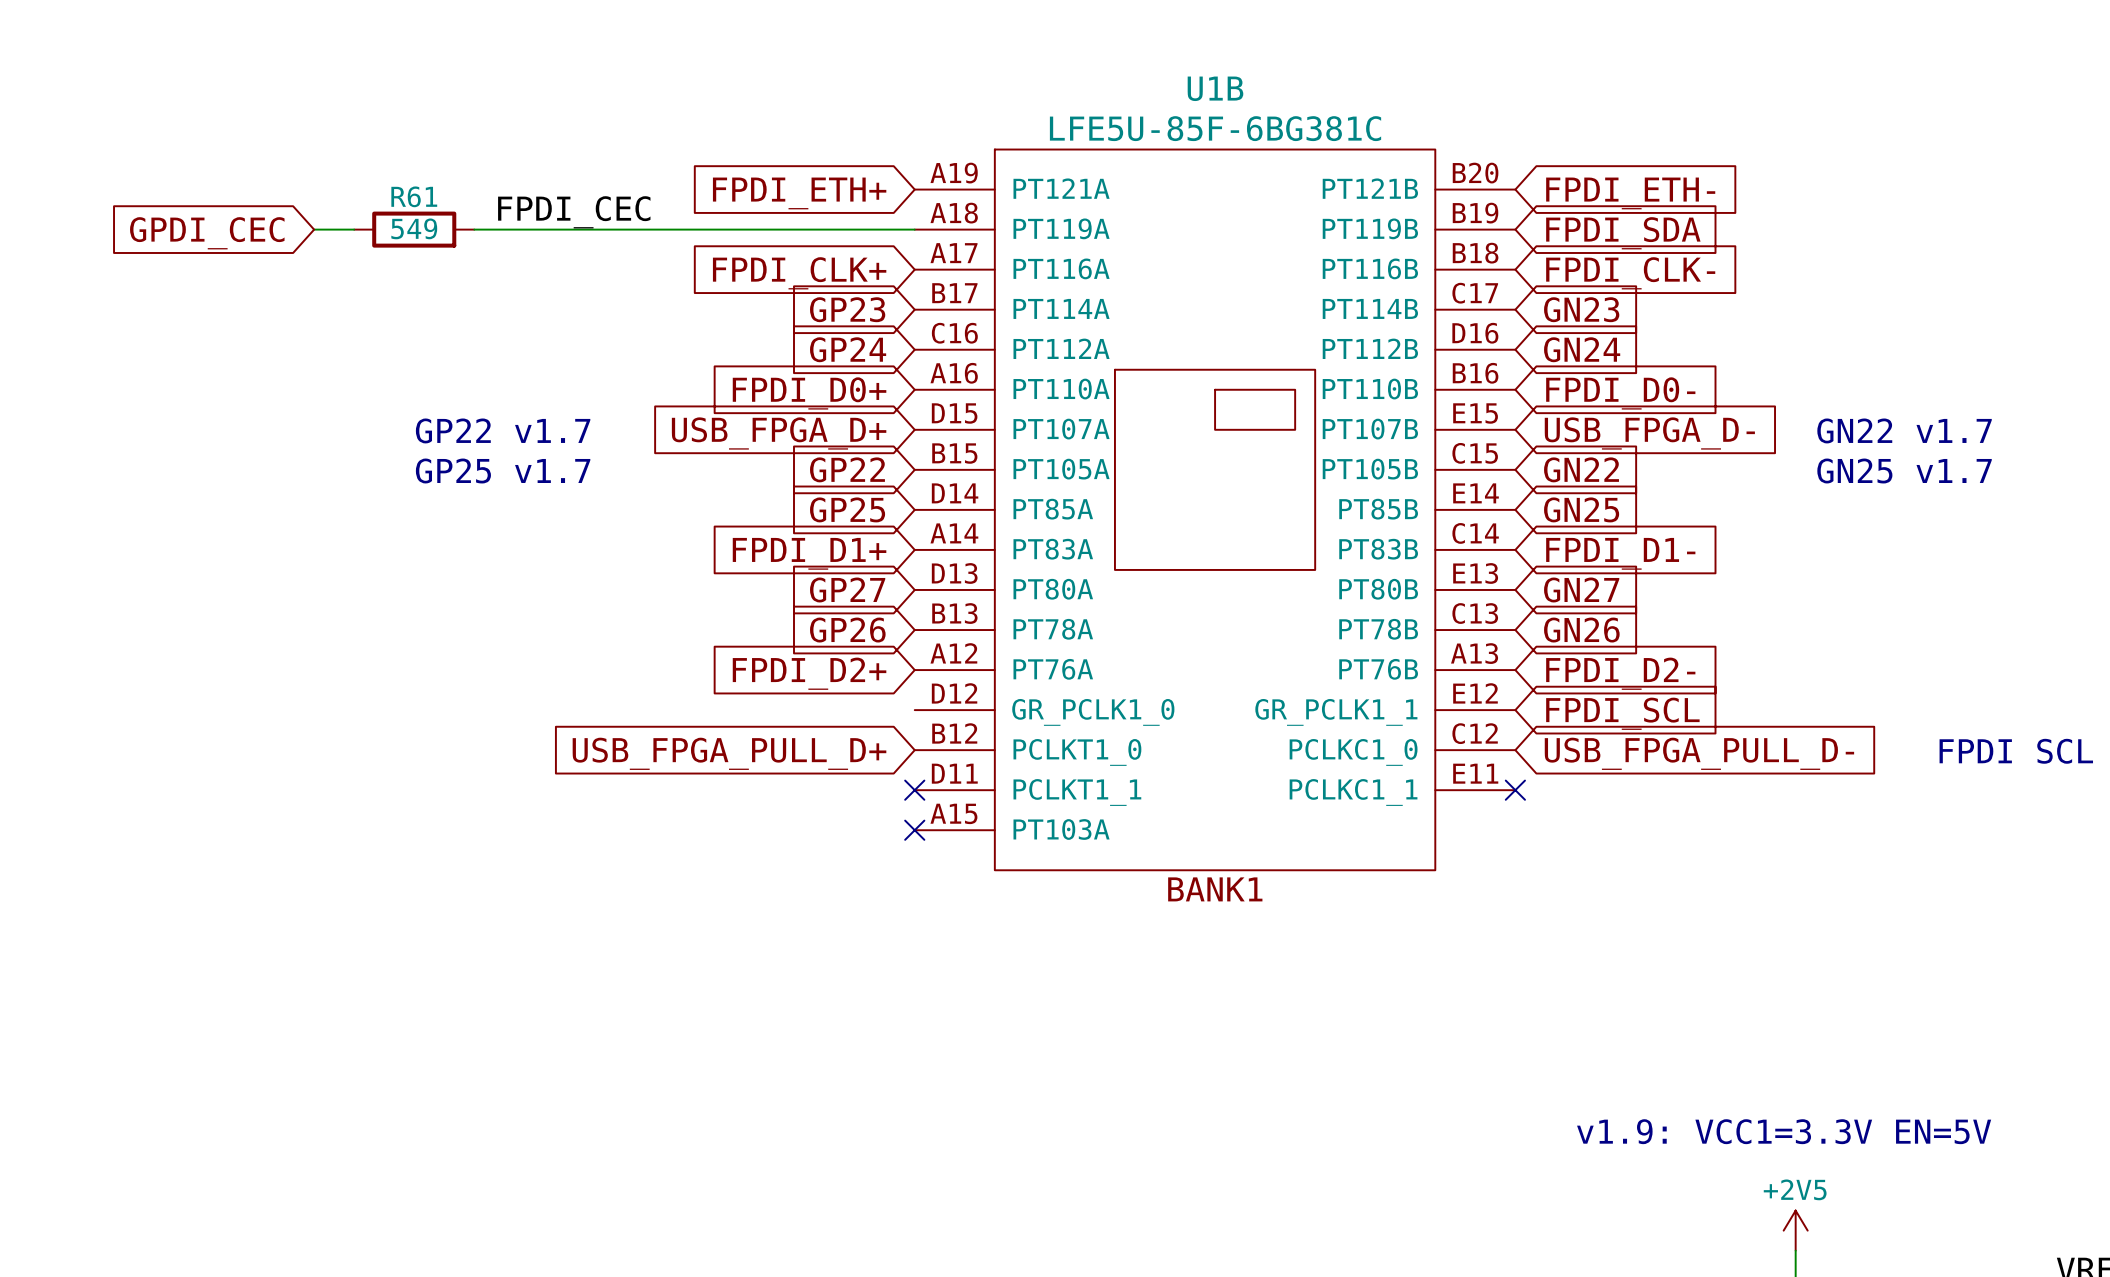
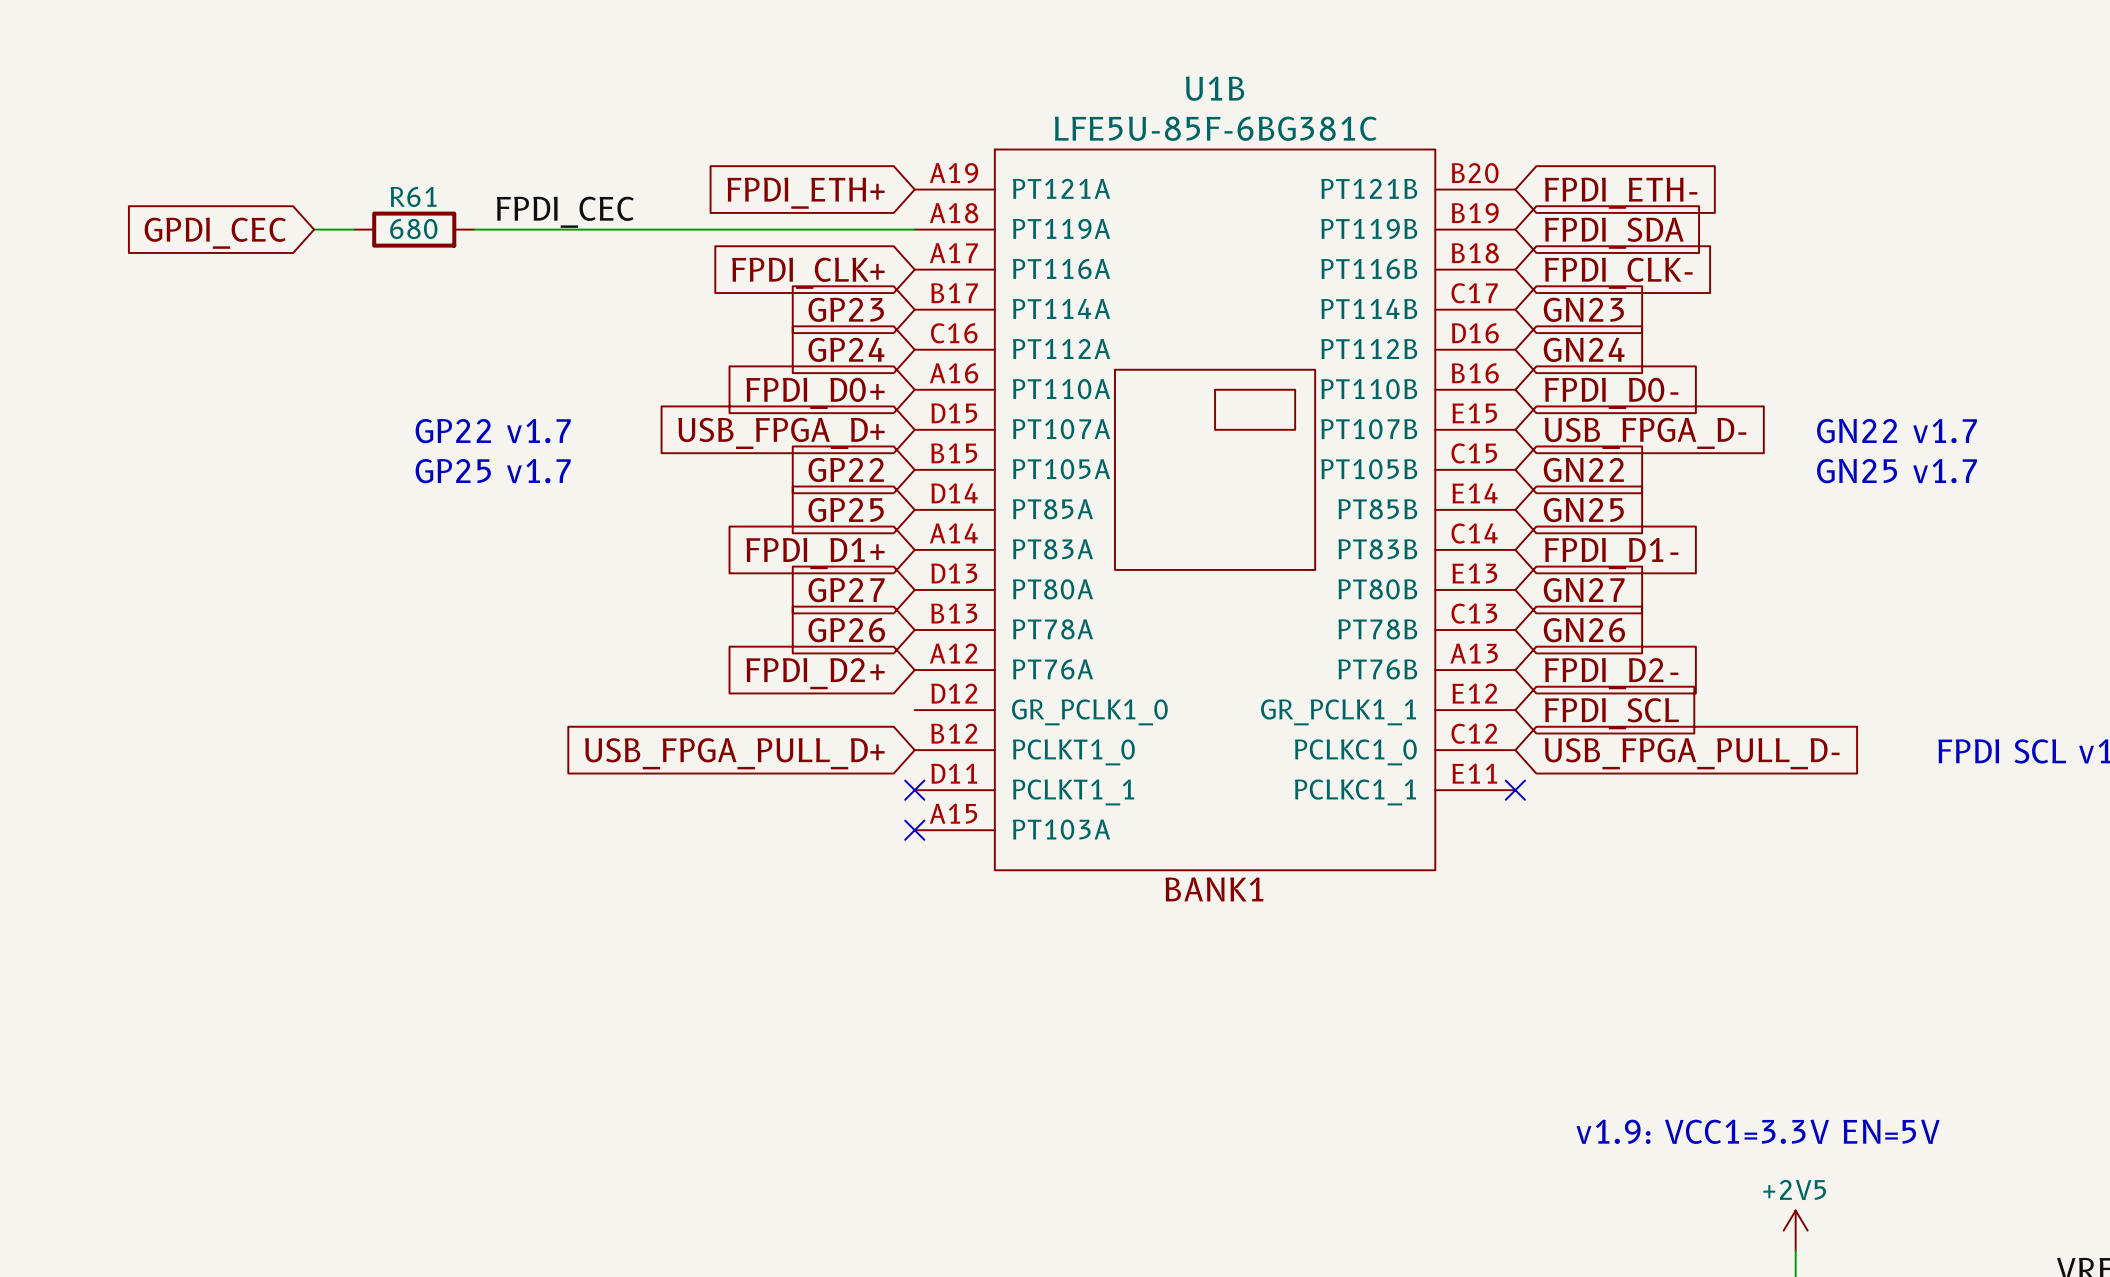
R61 value: 549 (414, 228) -> 680 (413, 228)

